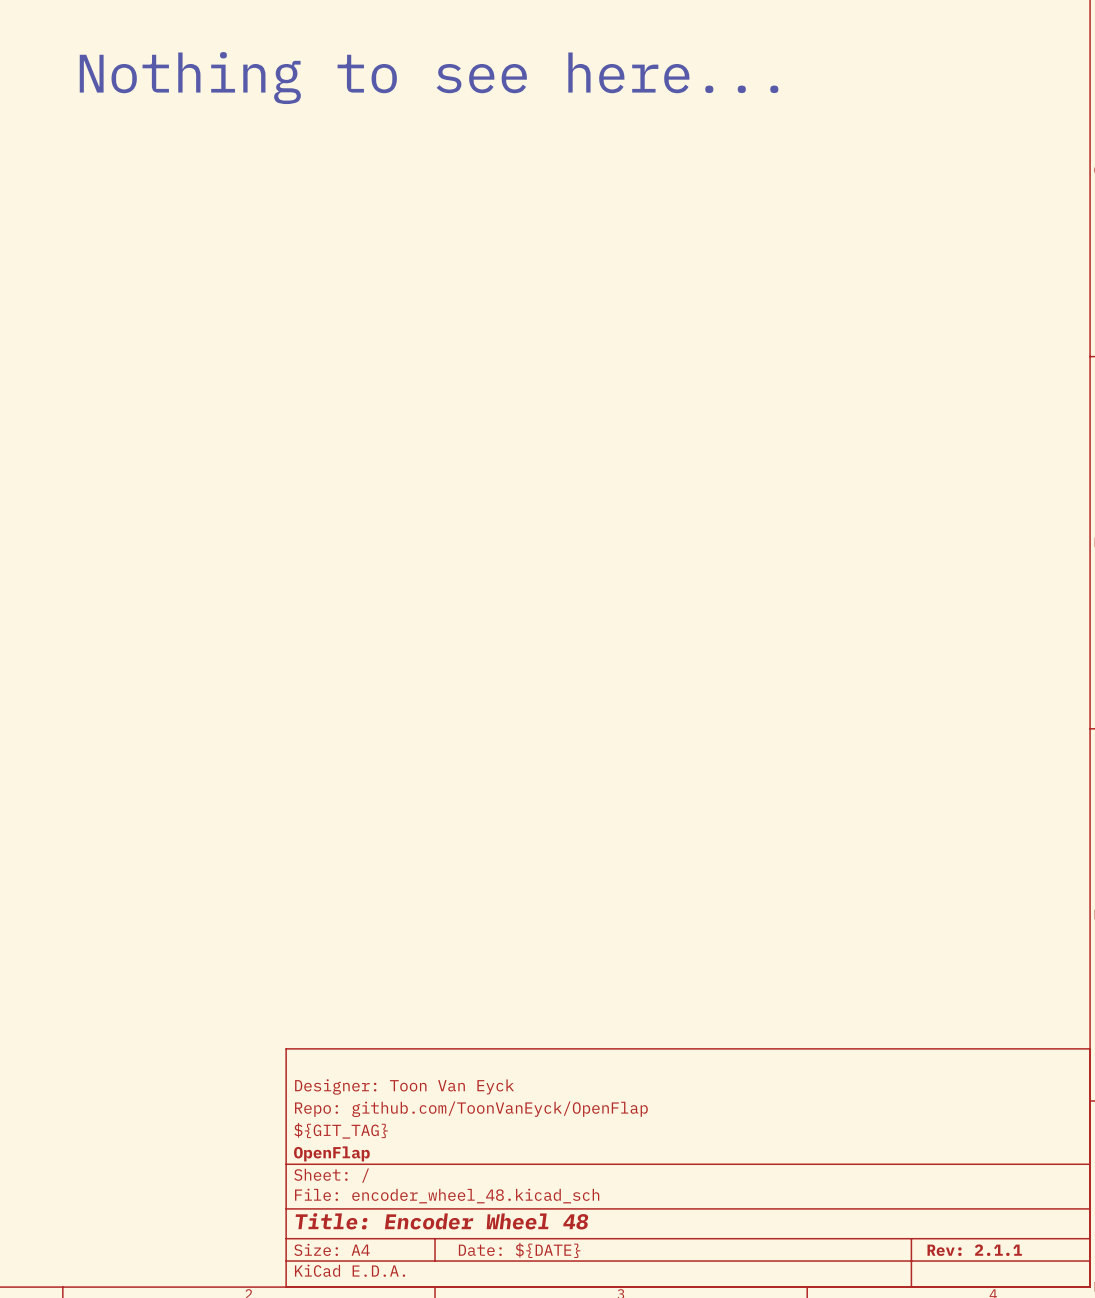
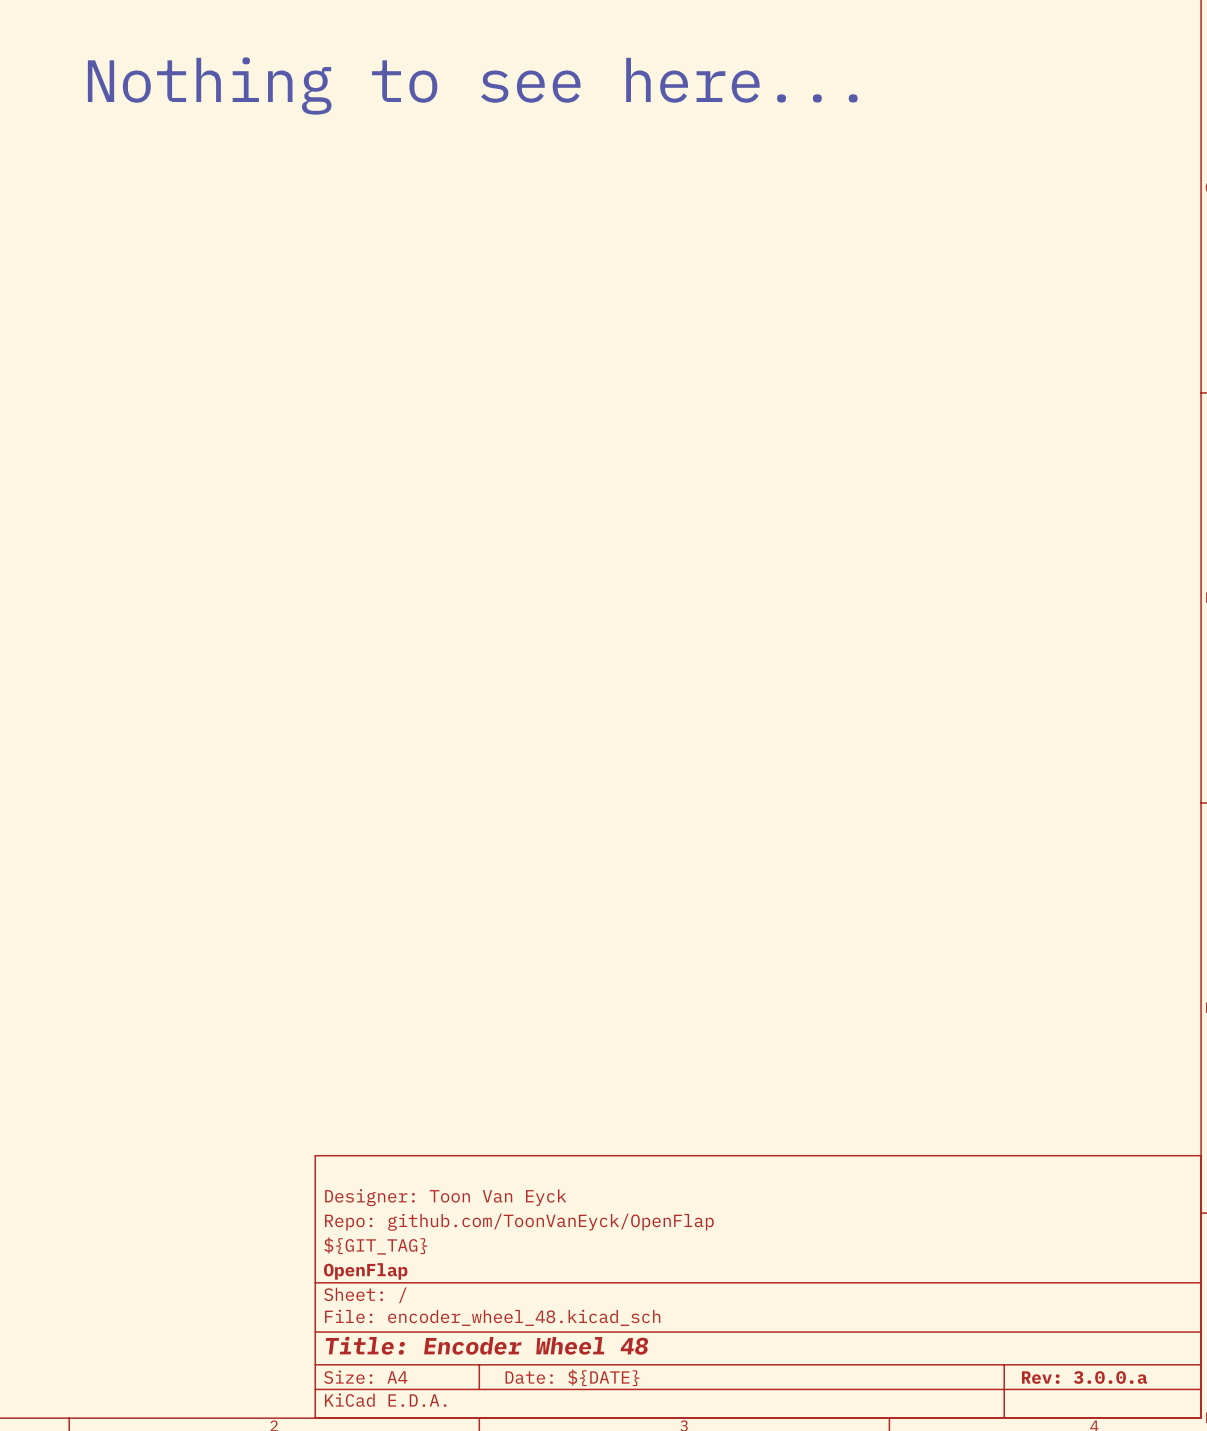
title block: Rev: 2.1.1 (974, 1250) -> Rev: 3.0.0.a (1084, 1377)

